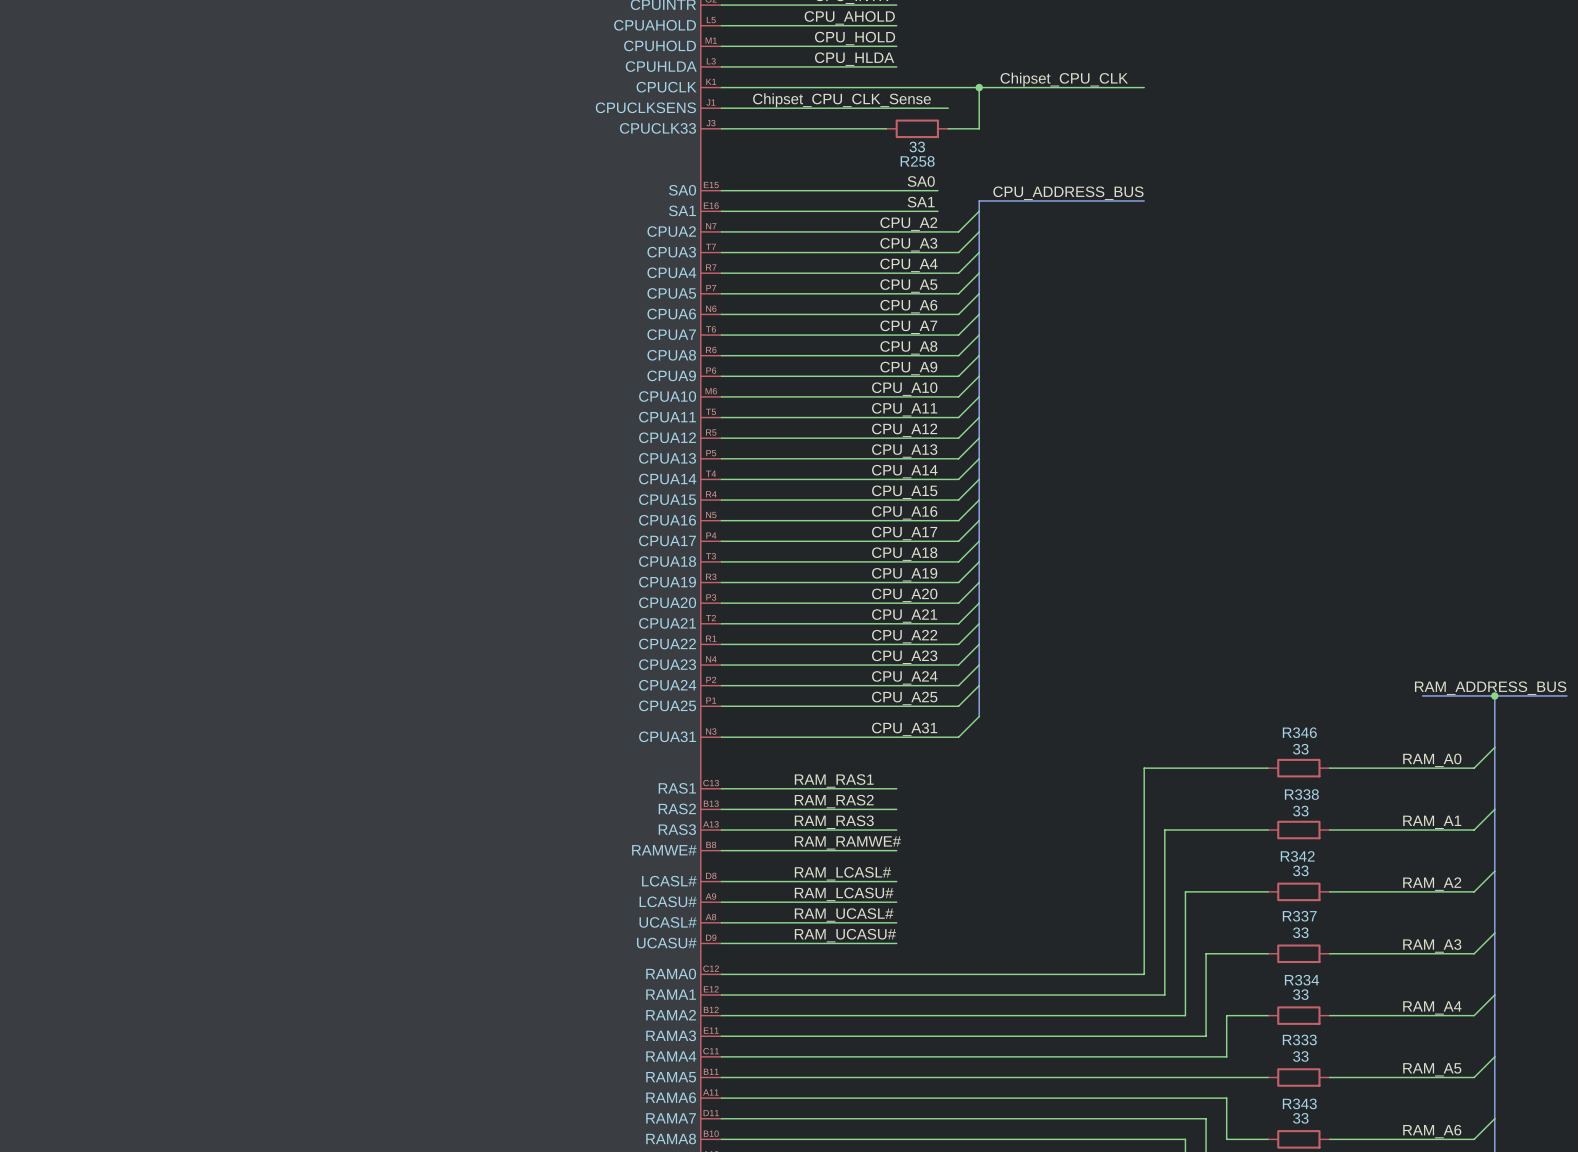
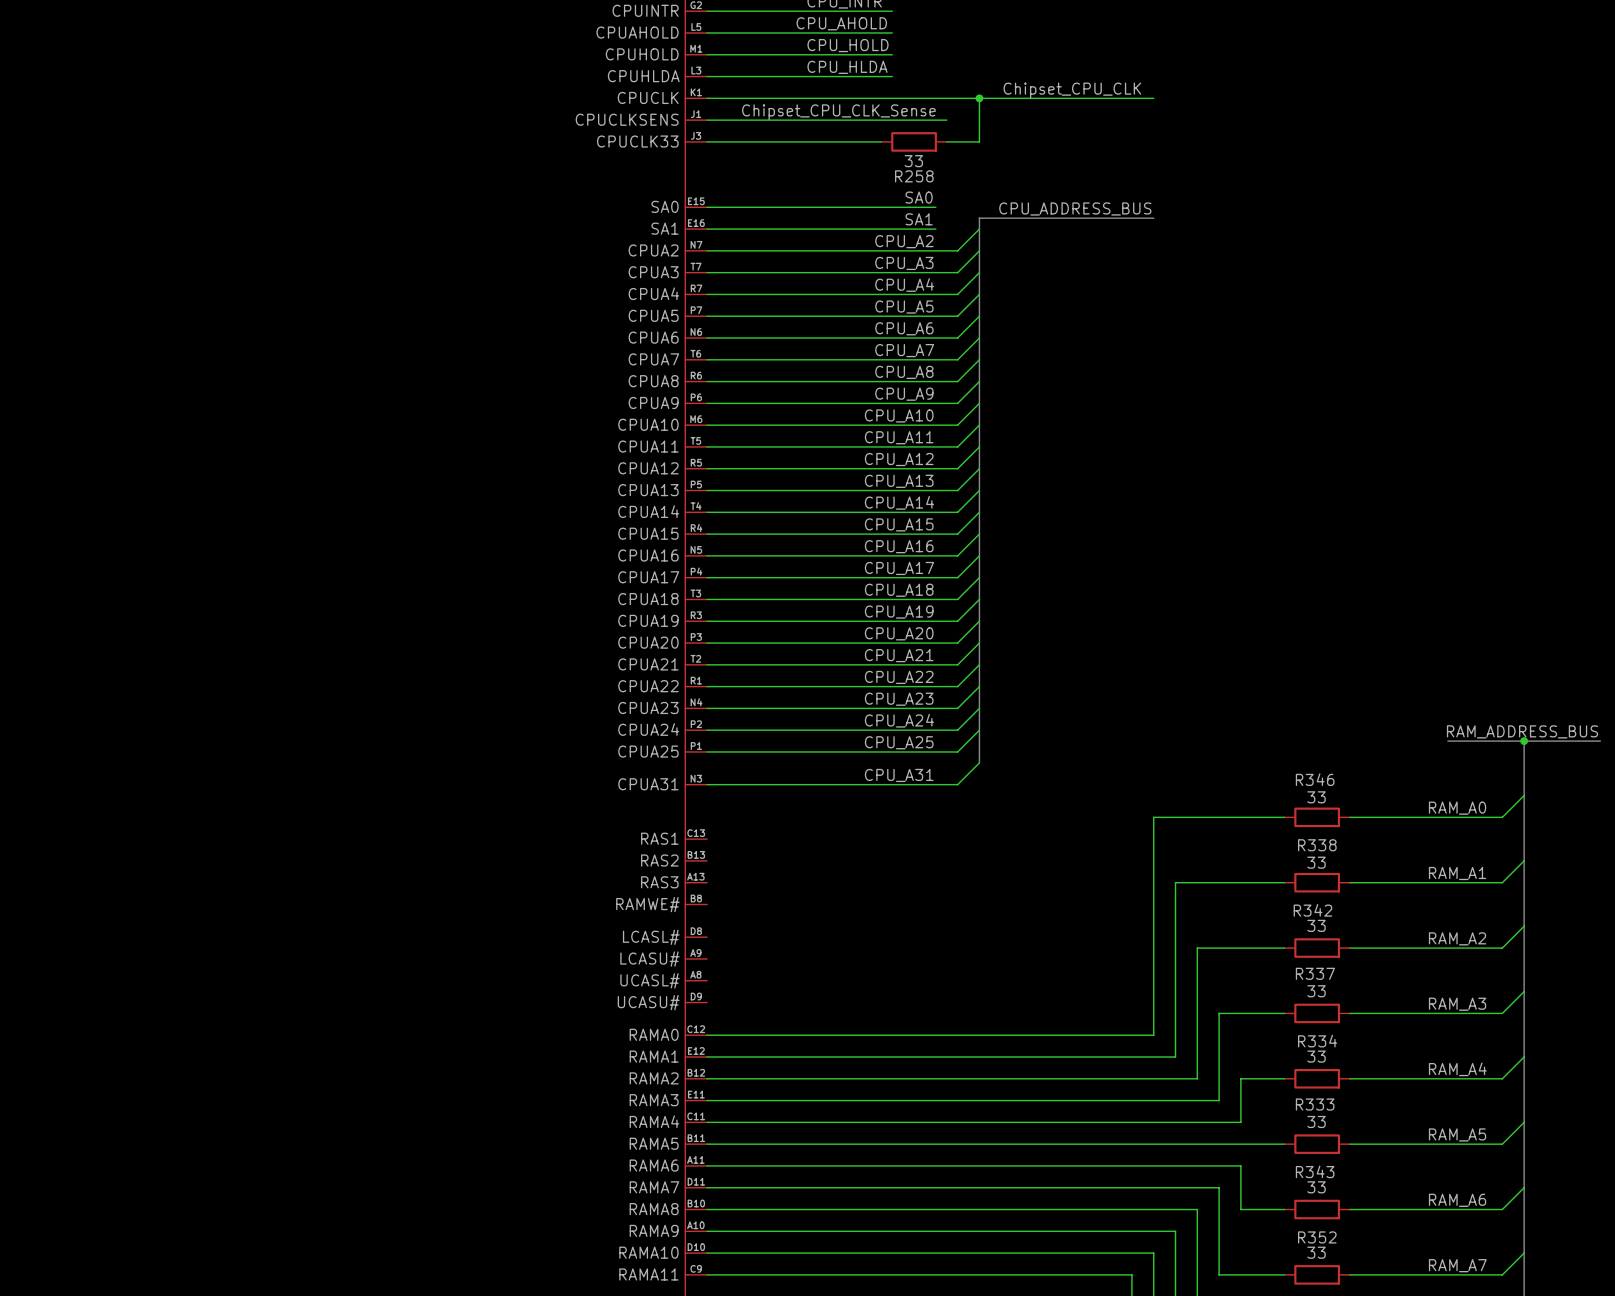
label: RAM_RAS1 (834, 780) -> none
wire: (721, 788) (896, 788) -> none
label: RAM_RAS2 (834, 801) -> none
wire: (721, 809) (896, 809) -> none
label: RAM_RAS3 (834, 822) -> none
wire: (721, 830) (896, 830) -> none
label: RAM_RAMWE# (847, 842) -> none
wire: (721, 850) (896, 850) -> none
label: RAM_LCASL# (842, 873) -> none
wire: (721, 881) (896, 881) -> none
label: RAM_LCASU# (844, 894) -> none
wire: (721, 902) (896, 902) -> none
label: RAM_UCASL# (844, 915) -> none
wire: (721, 922) (896, 922) -> none
label: RAM_UCASU# (845, 935) -> none
wire: (721, 943) (896, 943) -> none

